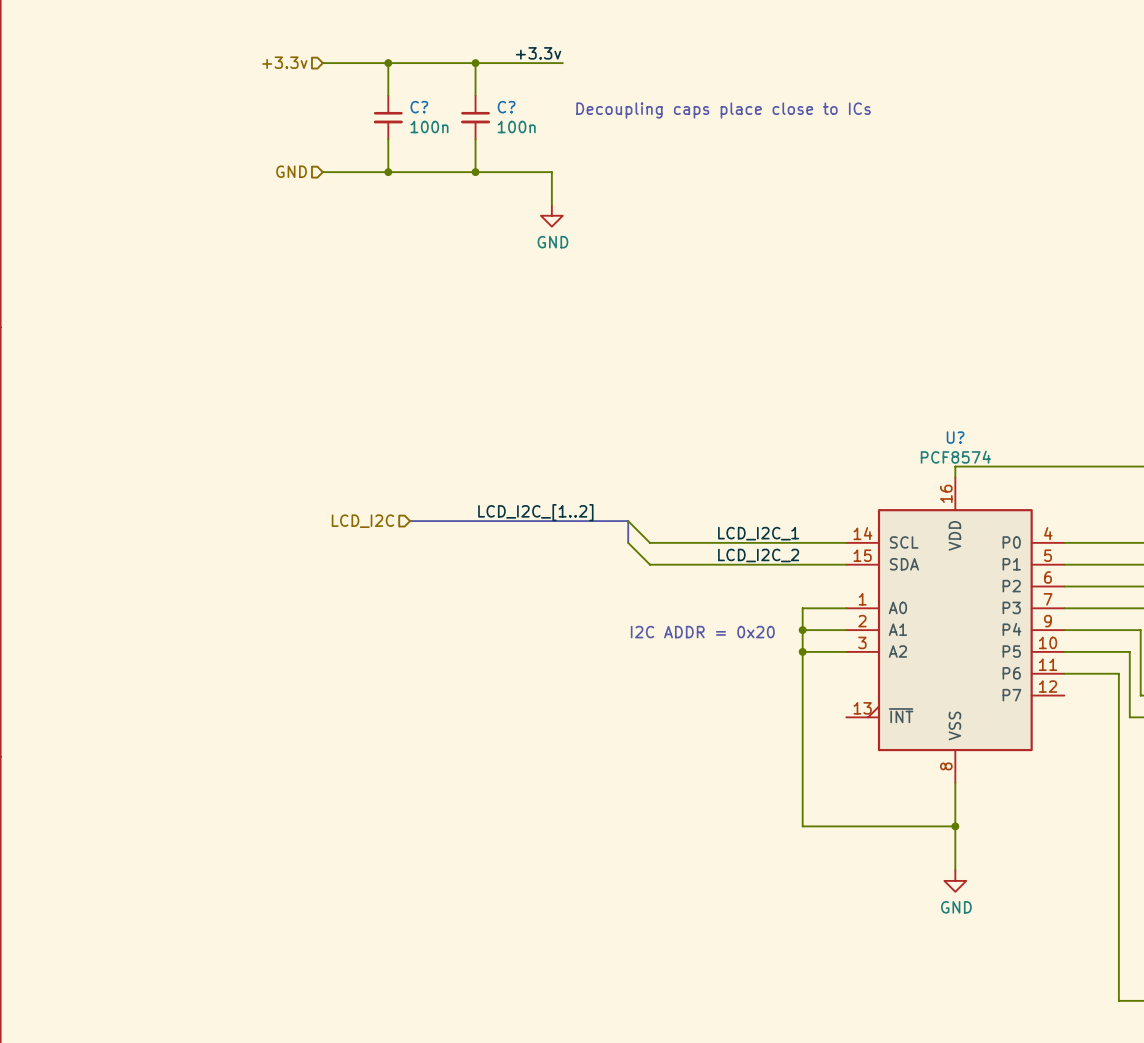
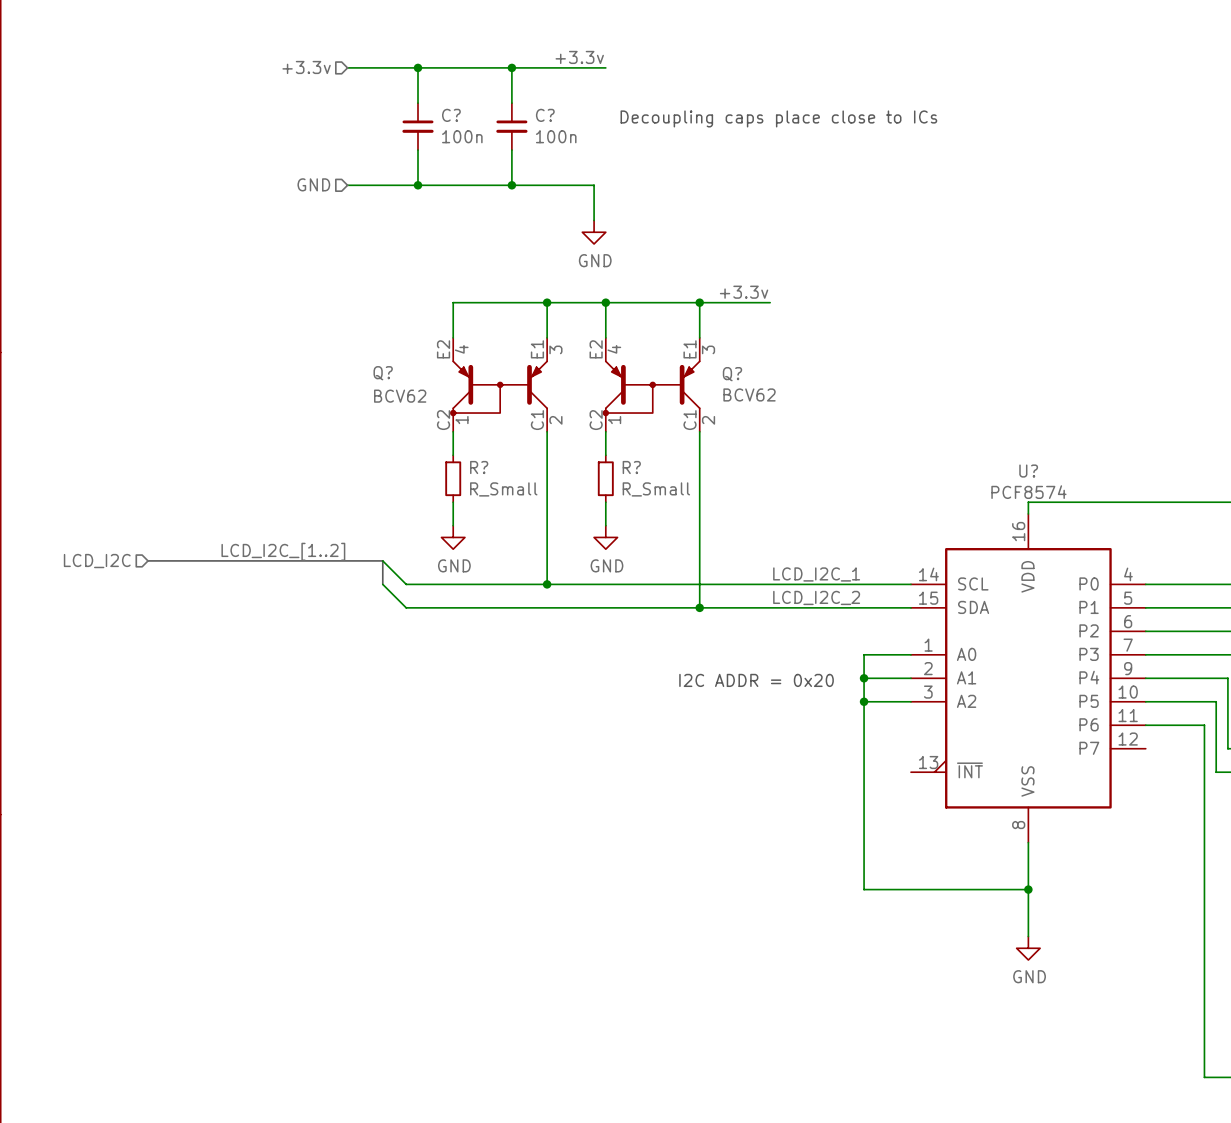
label: none -> +3.3v (744, 292)
wire: none -> (547, 302) (547, 337)
junction: none -> (547, 302)
wire: none -> (605, 302) (605, 337)
junction: none -> (605, 302)
wire: none -> (699, 302) (699, 337)
junction: none -> (699, 302)
wire: none -> (770, 302) (453, 302) (453, 337)
Q?: none -> BCV62 (498, 384)
Q?: none -> BCV62 (651, 384)
wire: none -> (453, 431) (453, 455)
wire: none -> (547, 431) (547, 584)
wire: none -> (605, 431) (605, 455)
wire: none -> (699, 431) (699, 607) (406, 607) (382, 584)
R?: none -> R_Small (453, 478)
R?: none -> R_Small (605, 478)
wire: none -> (453, 502) (453, 525)
wire: none -> (605, 502) (605, 525)
power symbol: none -> GND (453, 537)
power symbol: none -> GND (605, 537)
label: none -> LCD_I2C_[1..2] (283, 551)
label: LCD_I2C_[1..2] (535, 512) -> none
hierarchical label: none -> LCD_I2C (97, 561)
bus: none -> (148, 560) (382, 560) (382, 584)
hierarchical label: LCD_I2C (362, 521) -> none
bus: (410, 521) (628, 521) (628, 542) -> none
wire: (628, 521) (650, 542) -> (382, 560) (406, 584) (699, 584)
junction: none -> (547, 584)
wire: (628, 542) (650, 564) -> none
junction: none -> (699, 607)

